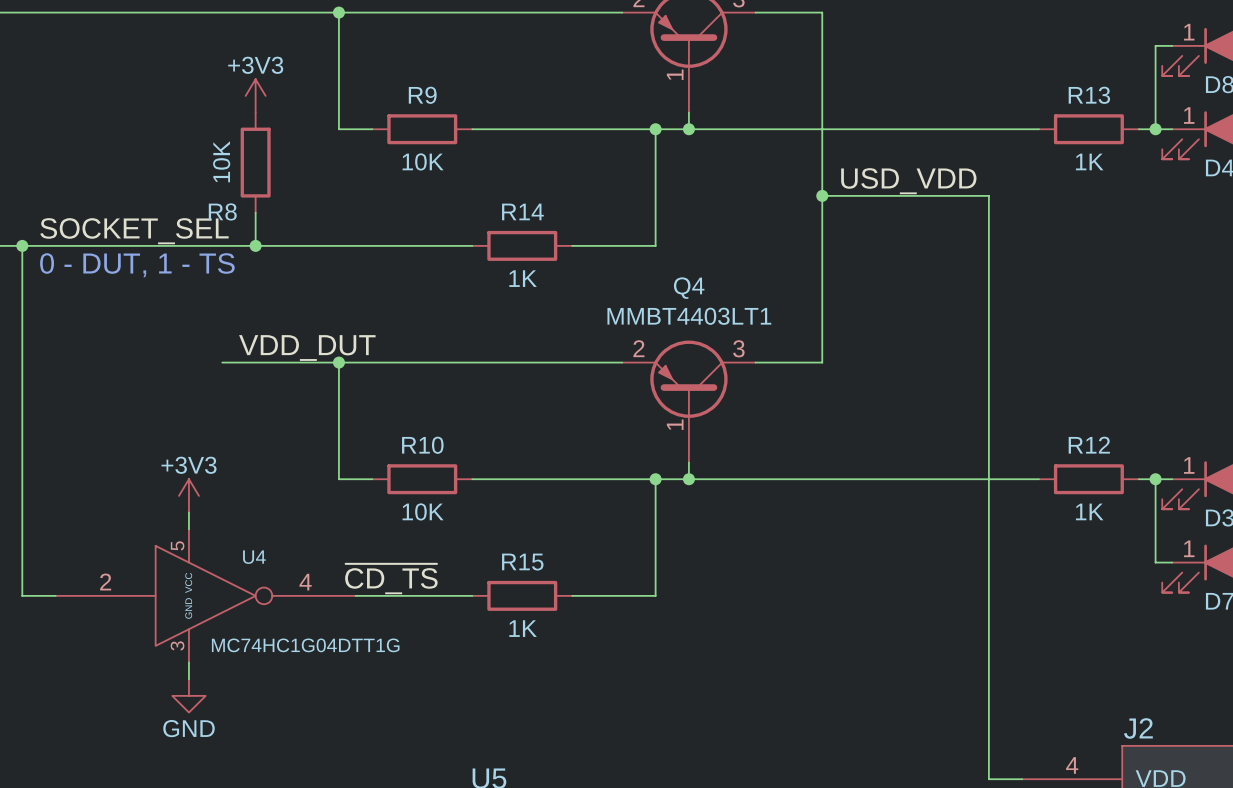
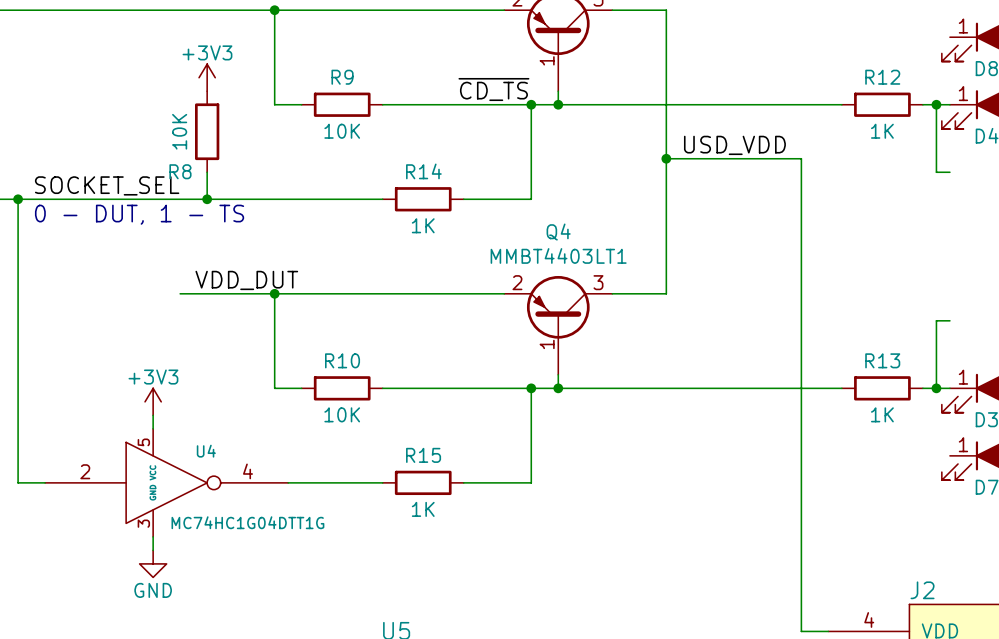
wire: (1172, 45) (1155, 45) (1155, 129) -> (949, 172) (936, 172) (936, 104)
R13 name: R13 (1089, 95) -> R12 (882, 77)
label: none -> ~{CD_TS} (493, 89)
R12 name: R12 (1089, 445) -> R13 (882, 360)
wire: (1155, 479) (1155, 562) (1172, 562) -> (936, 388) (936, 320) (949, 320)
label: ~{CD_TS} (391, 579) -> none

